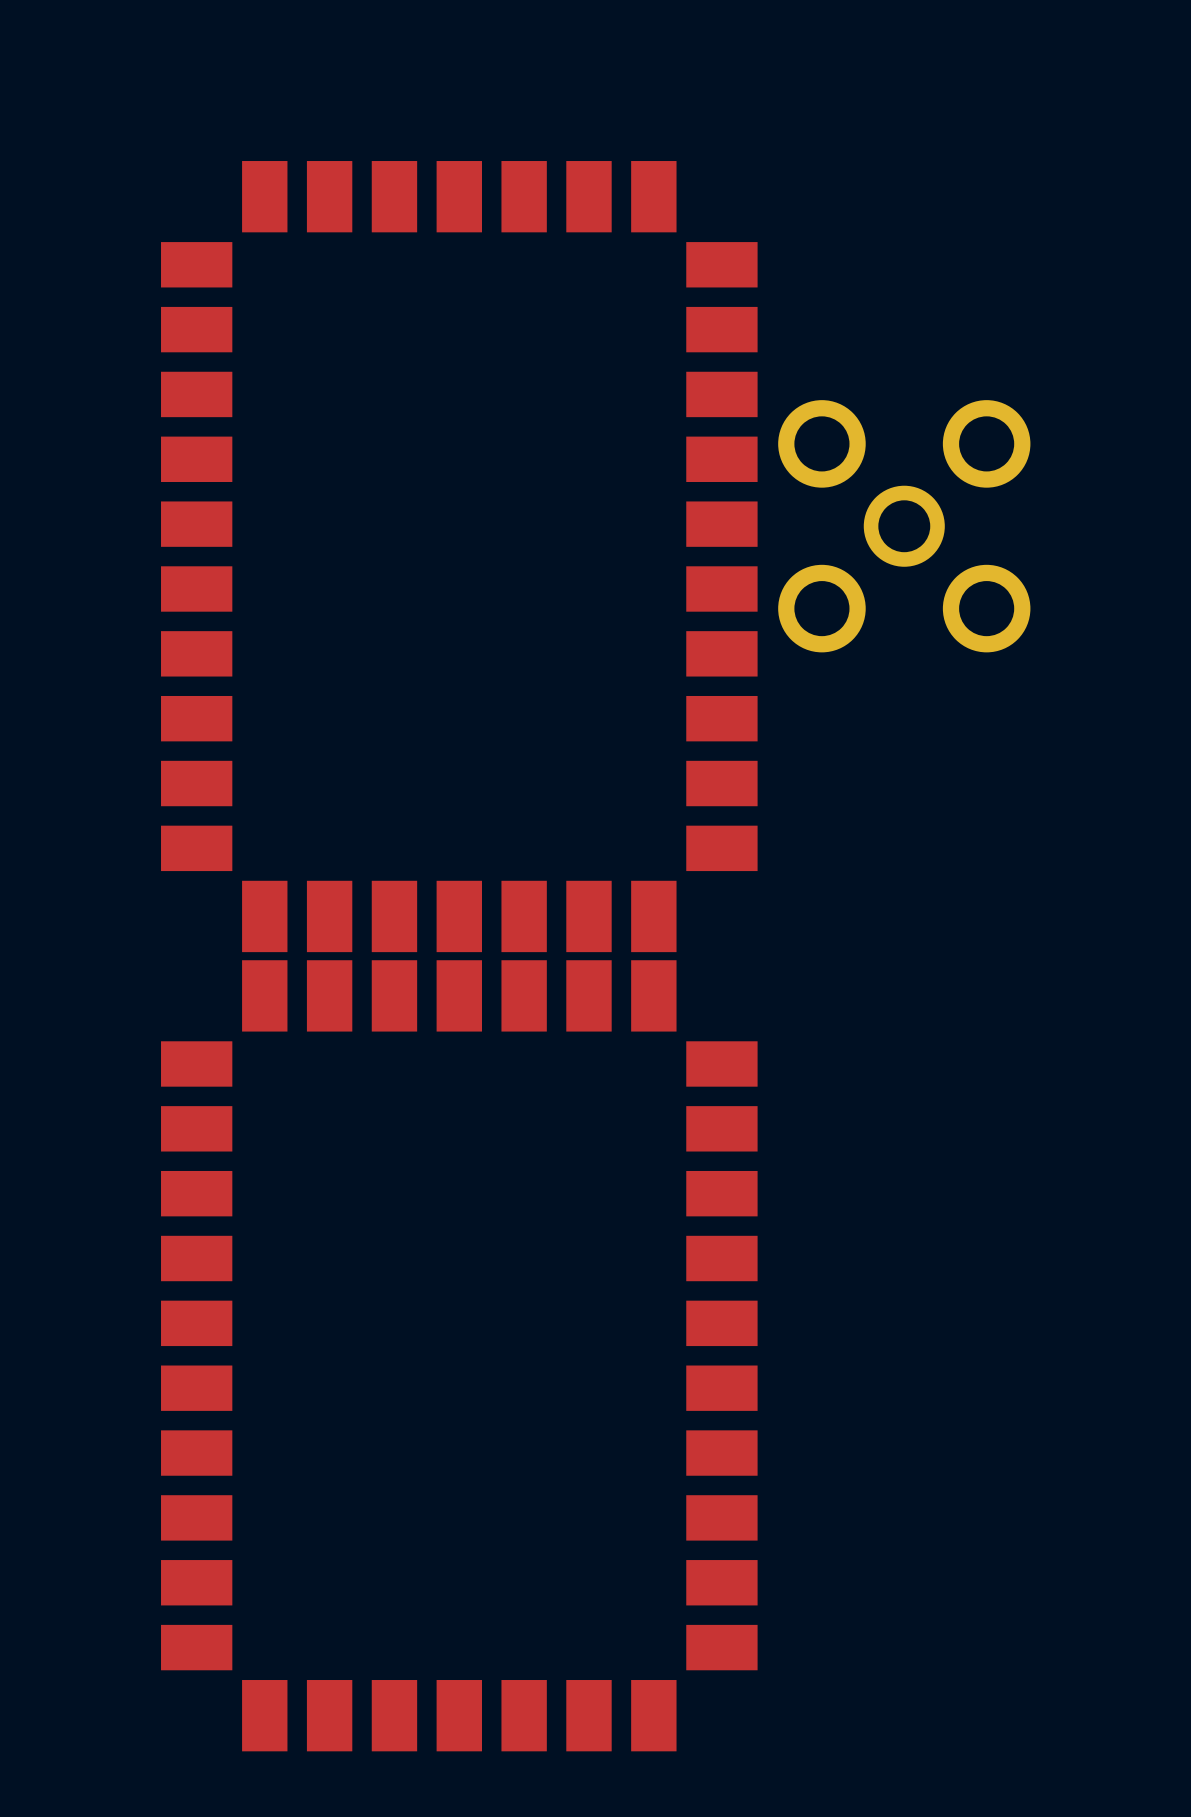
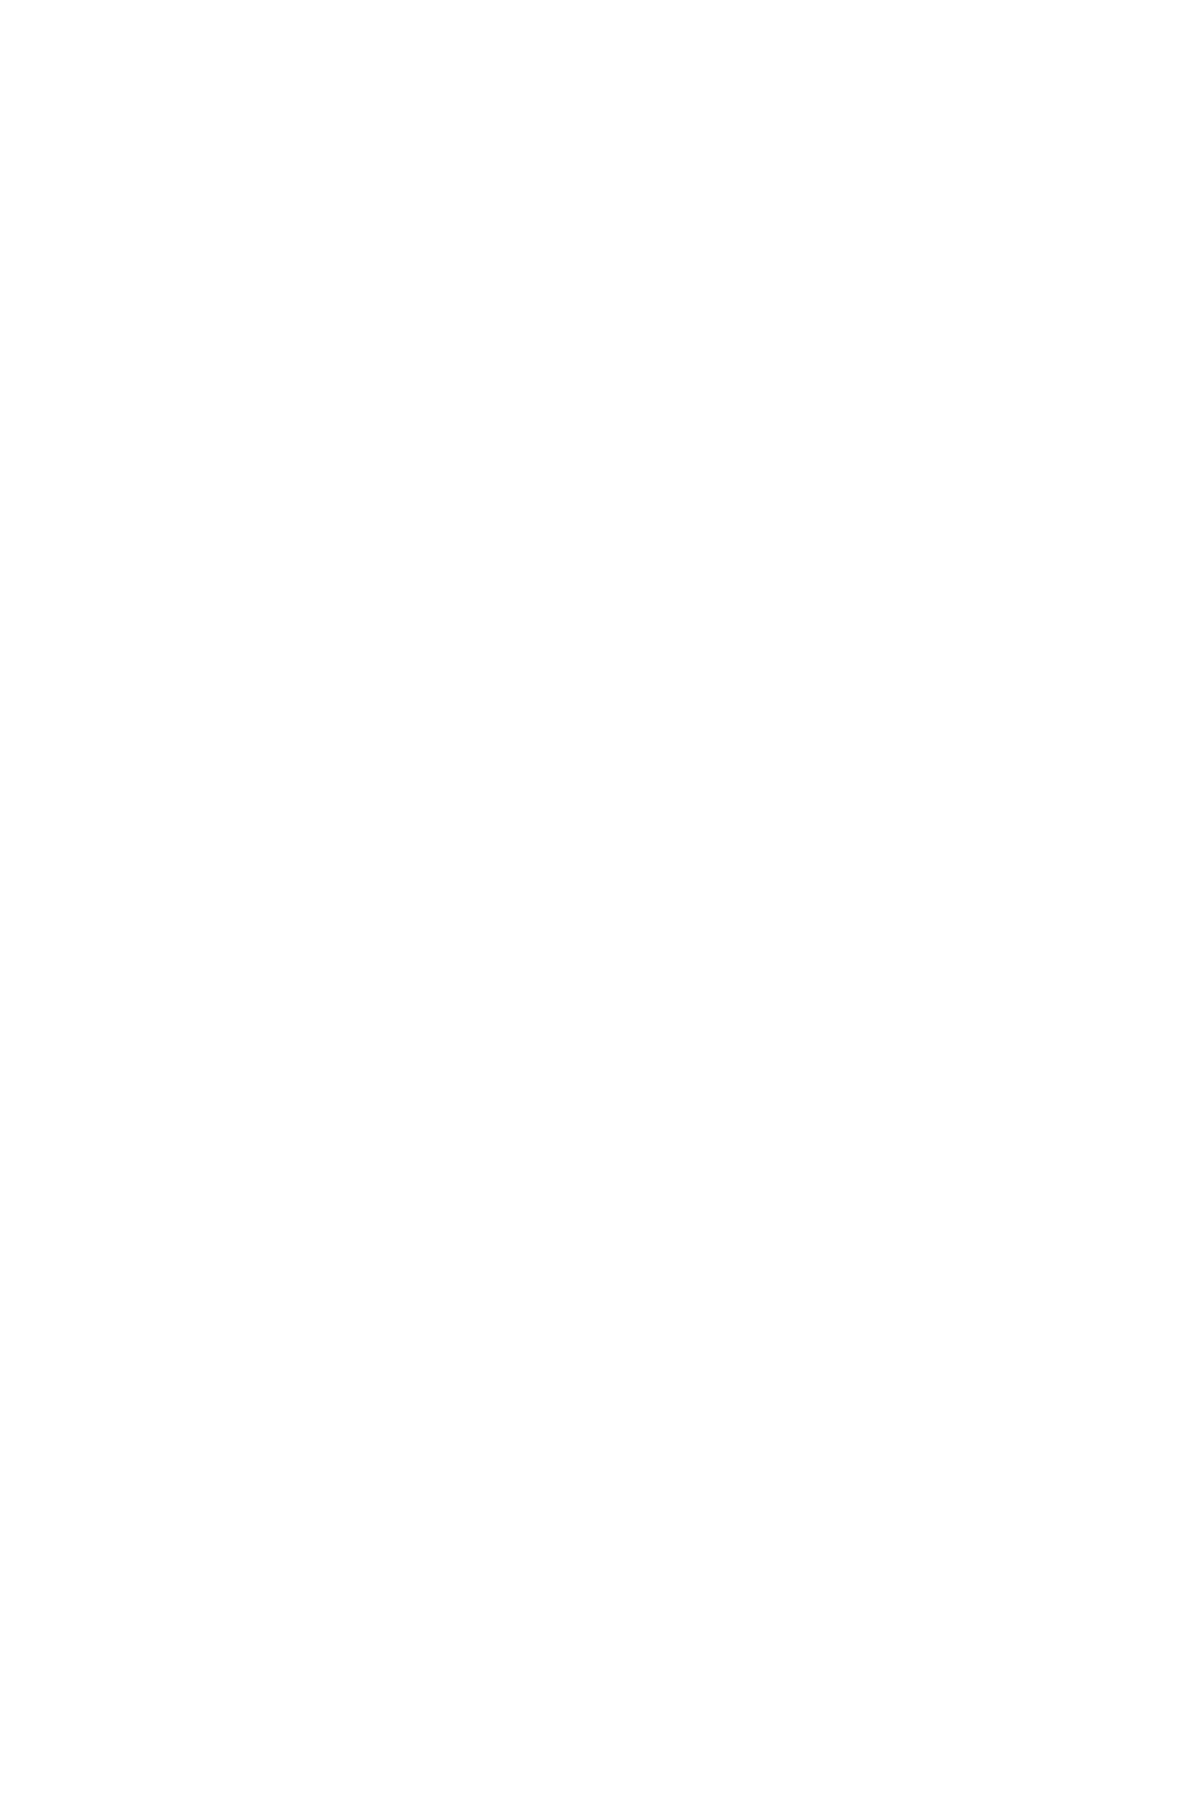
part: (904, 526) -> none
part: (459, 556) -> none
part: (459, 1355) -> none

